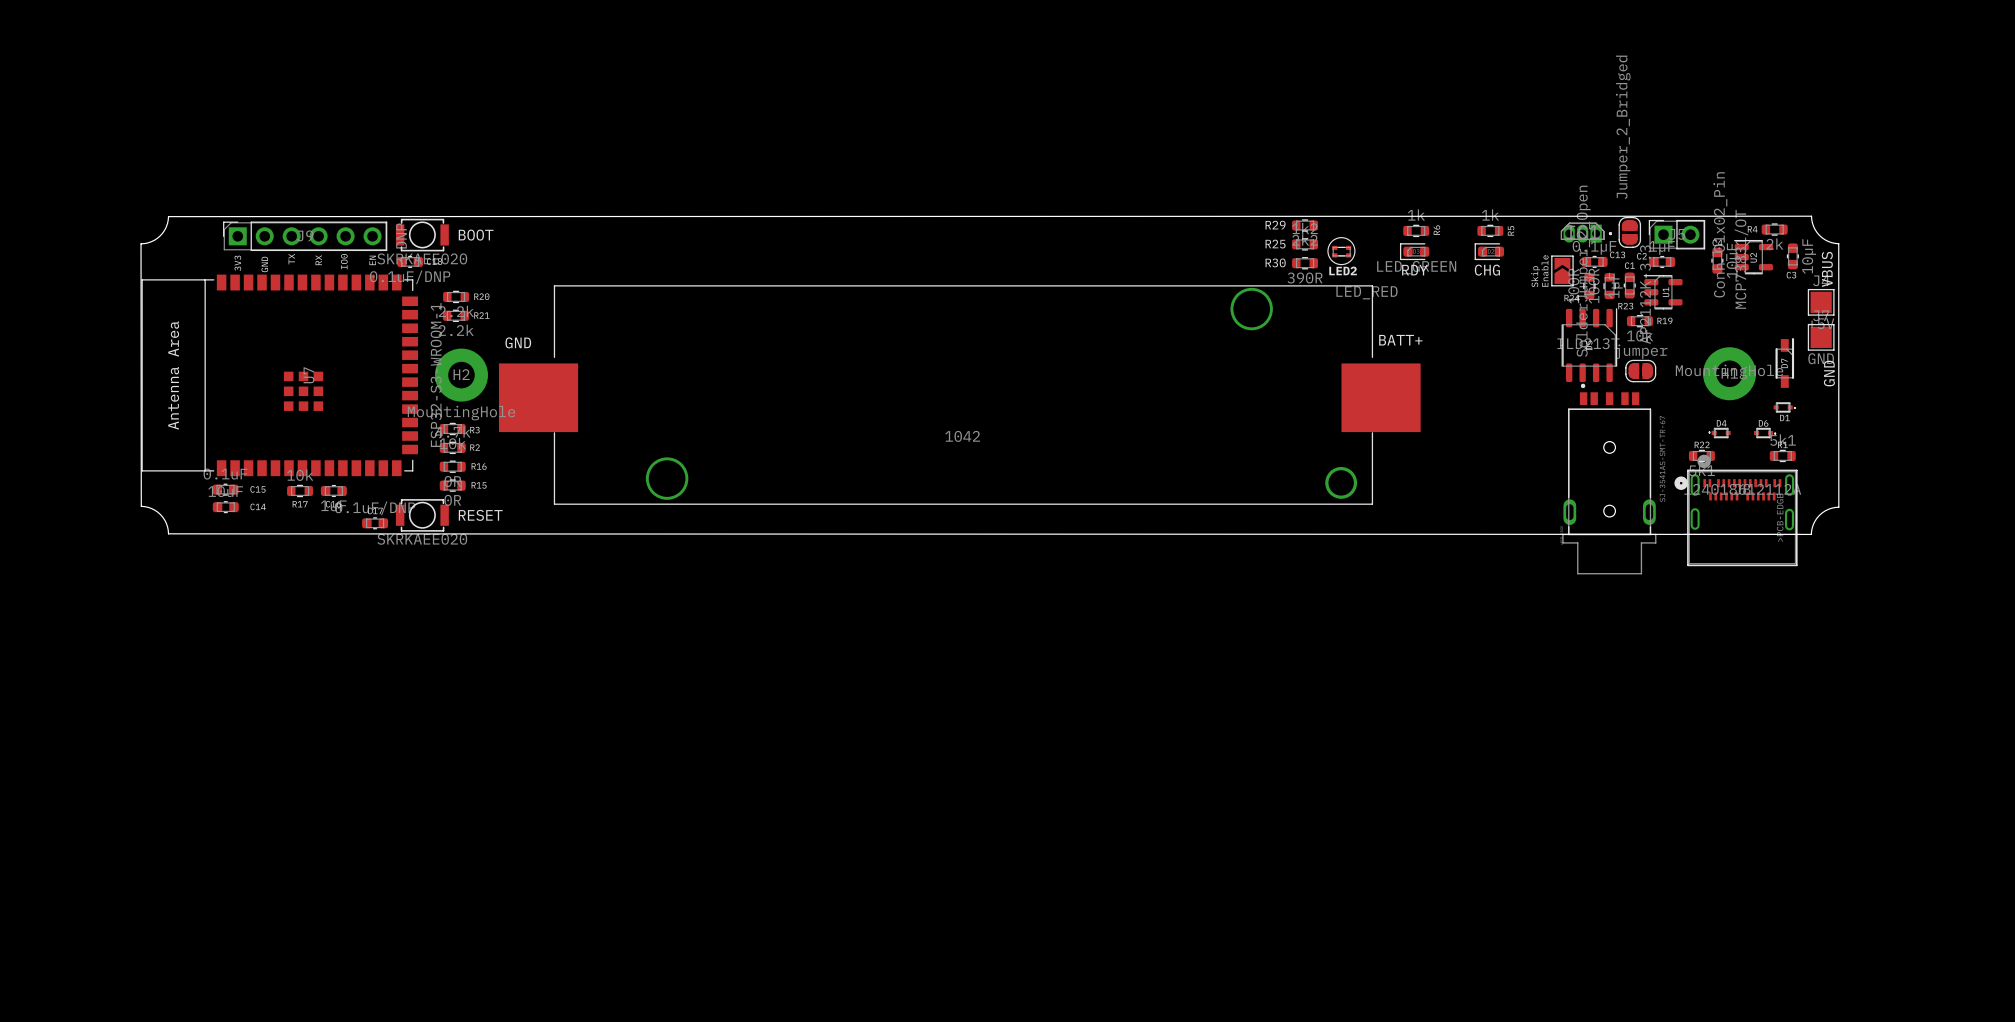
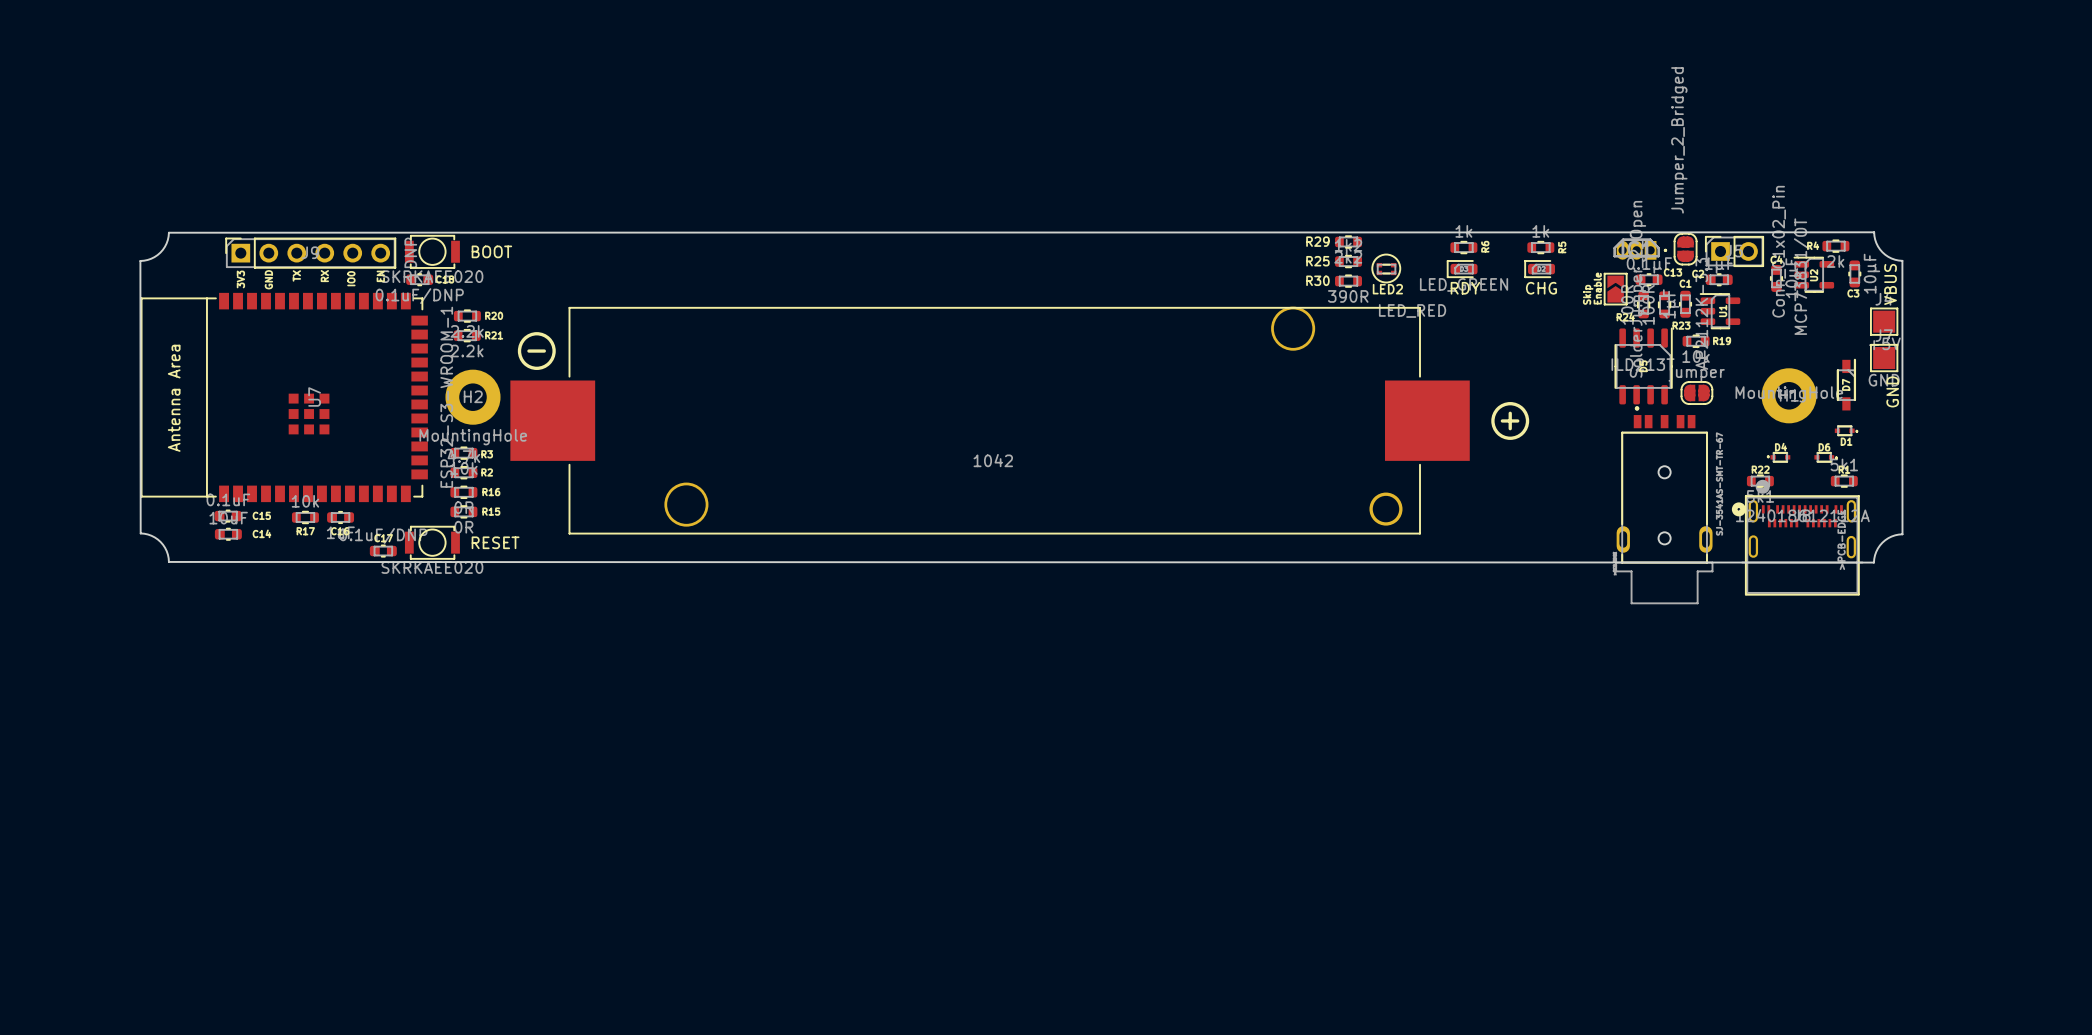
part footprint: [498, 285, 1421, 505] -> [510, 306, 1470, 535]
drawing: none -> [517, 332, 556, 371]
line: none -> (528, 351) (544, 351)
text: BATT+ (1400, 340) -> none
text: GND (518, 342) -> none
drawing: none -> [1491, 402, 1530, 440]
line: none -> (1510, 413) (1510, 428)
line: none -> (1502, 420) (1517, 420)

